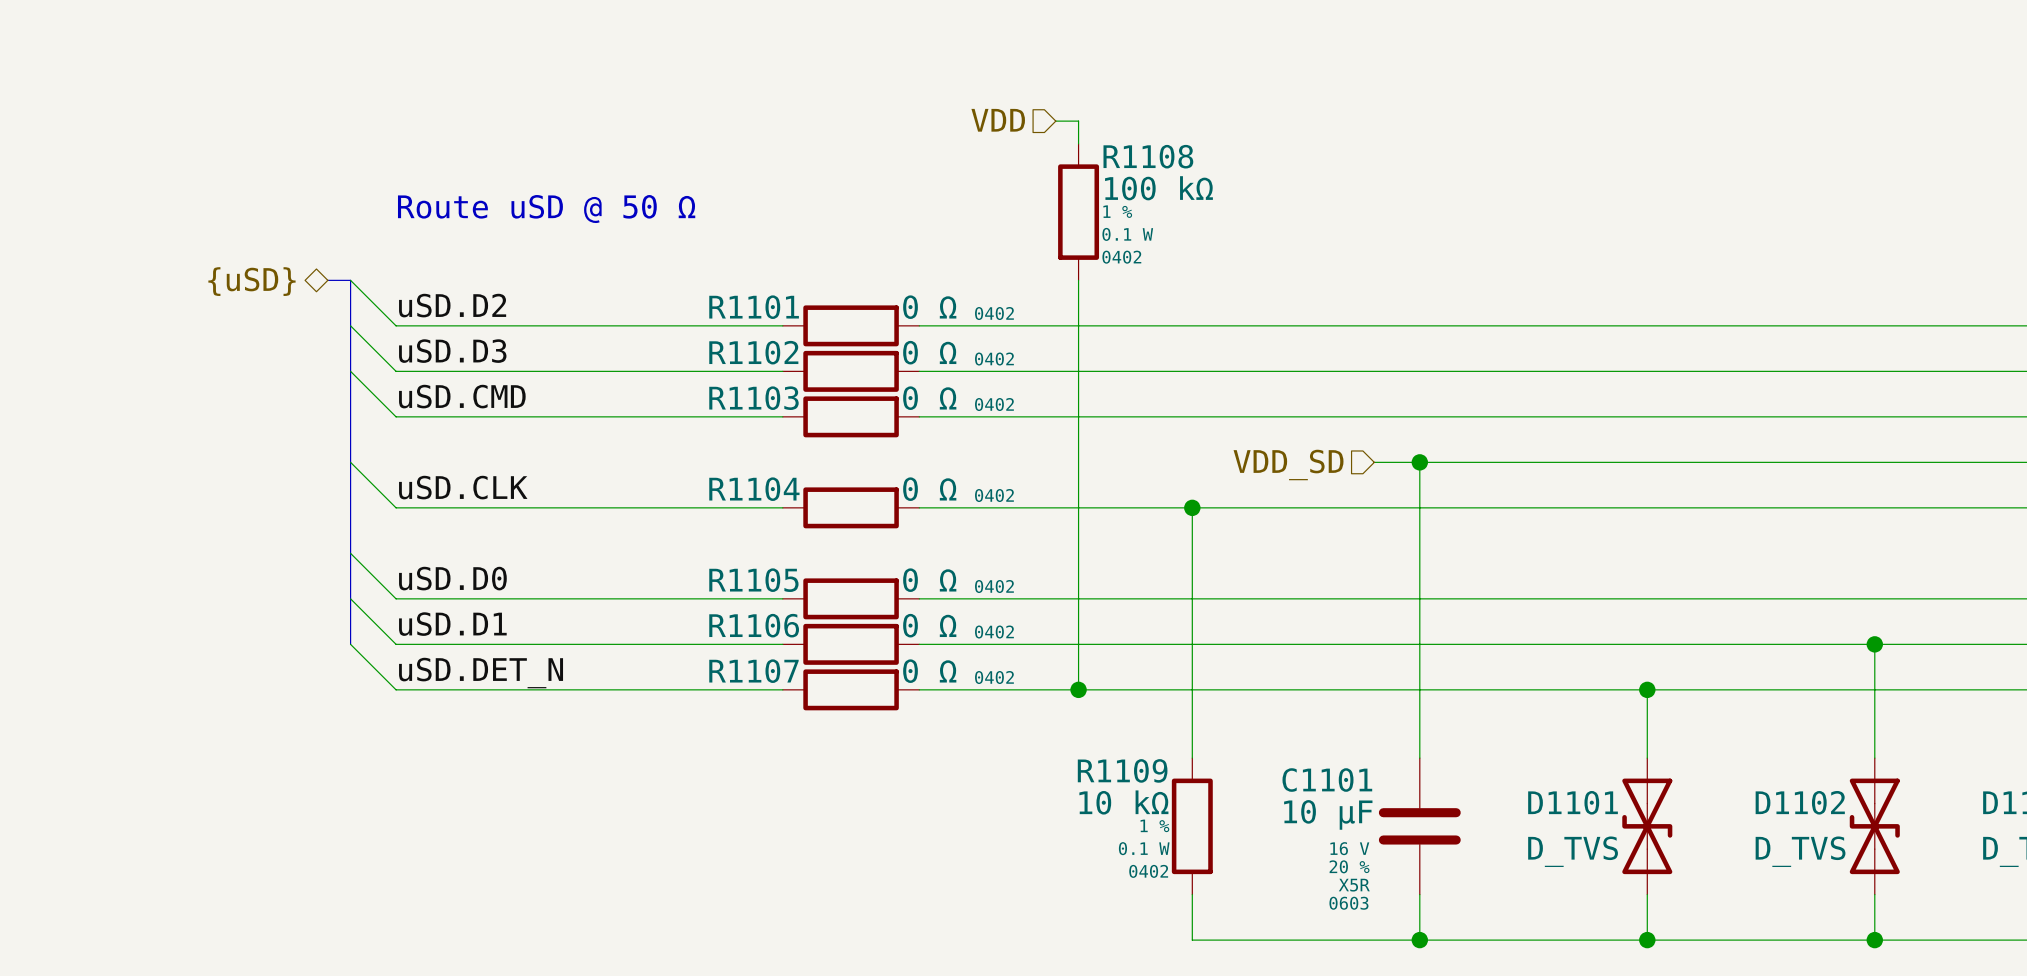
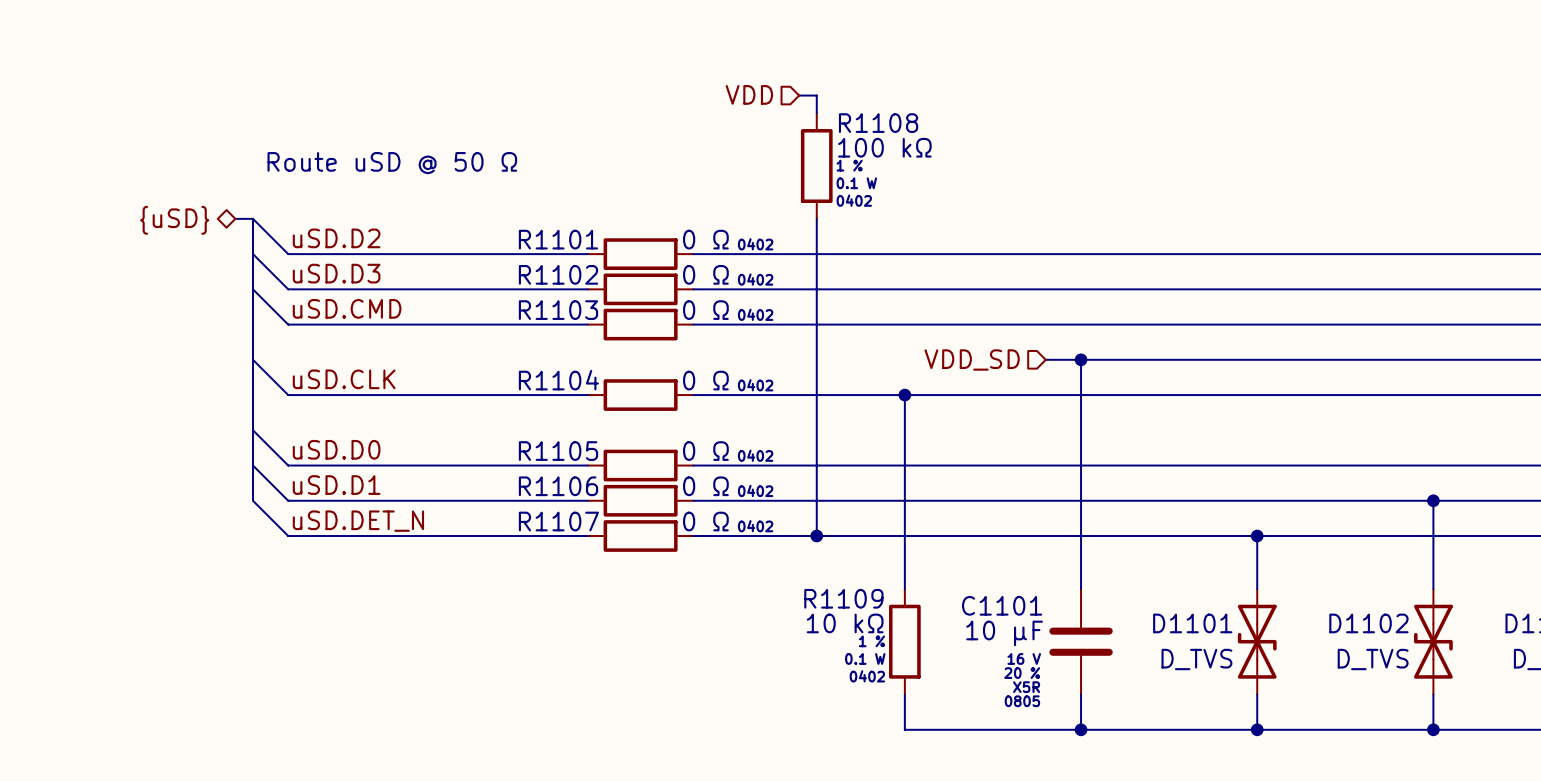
C1101 text: 0603 (1348, 903) -> 0805 (1022, 701)

